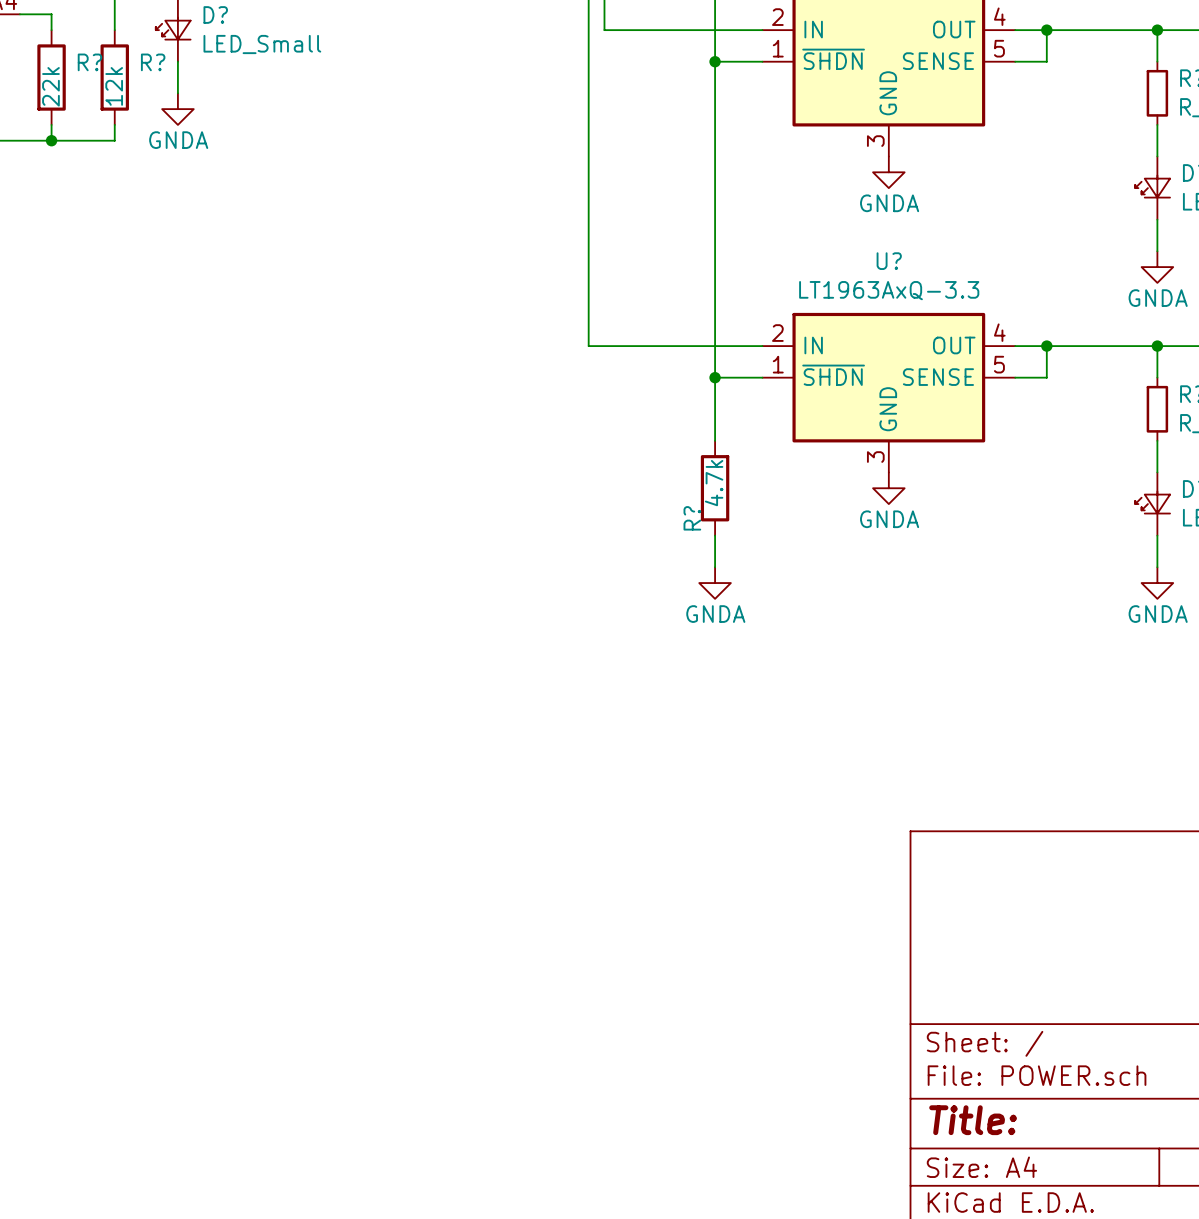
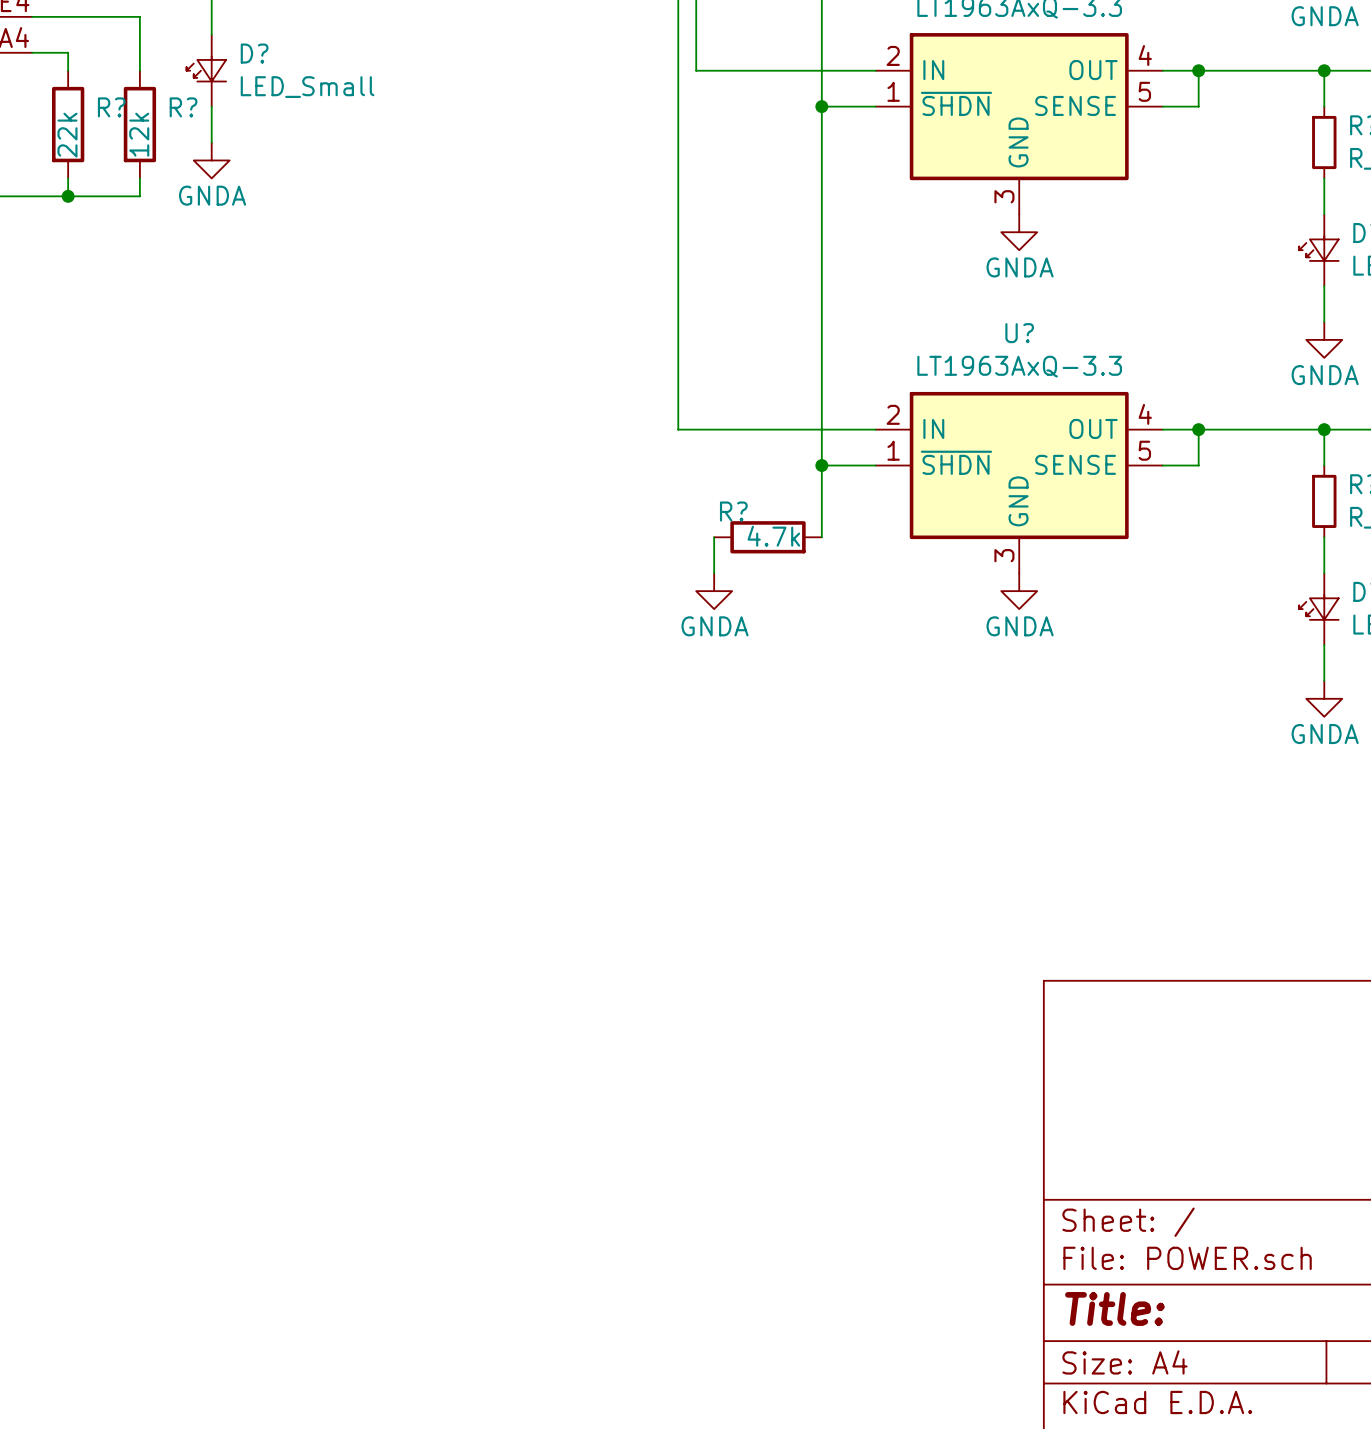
R? rotation: 0° (715, 488) -> 90° clockwise (767, 537)
R? position: (715, 488) -> (767, 537)
wire: (715, 535) (715, 567) -> (714, 537) (714, 573)
power symbol position: GNDA (715, 583) -> GNDA (714, 591)

